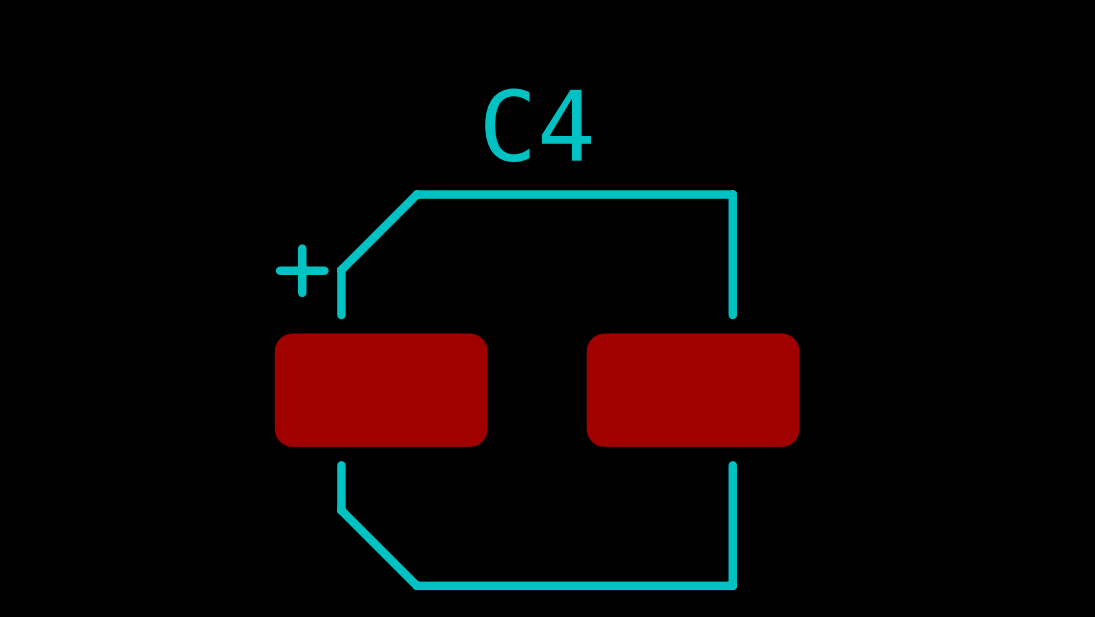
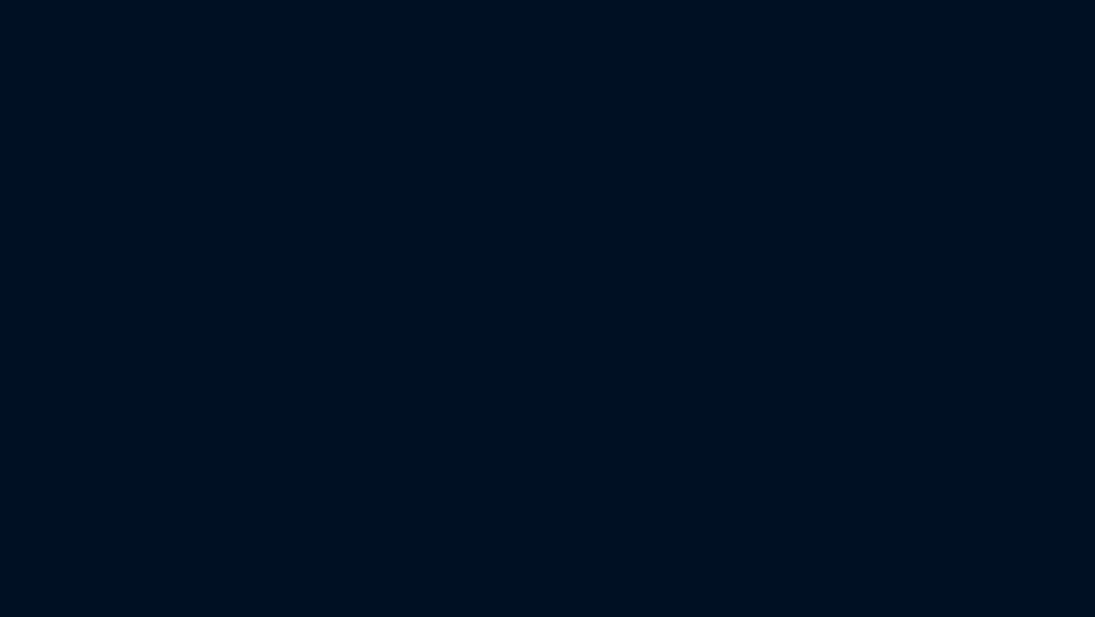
C4: (537, 390) -> none

